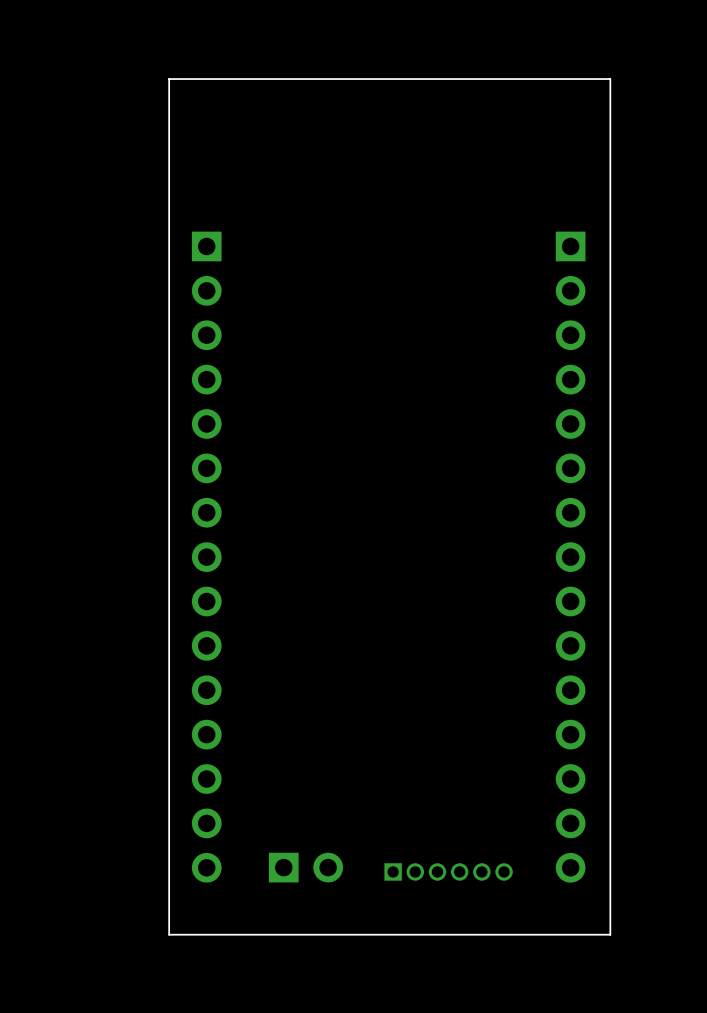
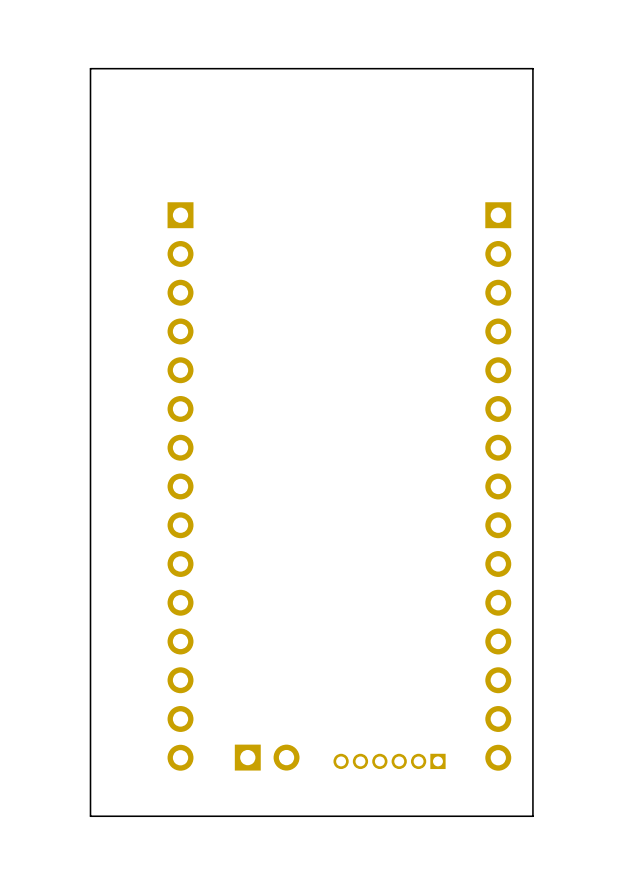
board edge: (610, 79) (169, 79) (169, 934) (610, 934) -> (532, 69) (90, 68) (90, 816) (532, 816)
part rotation: 0° (448, 871) -> 180° (389, 761)

